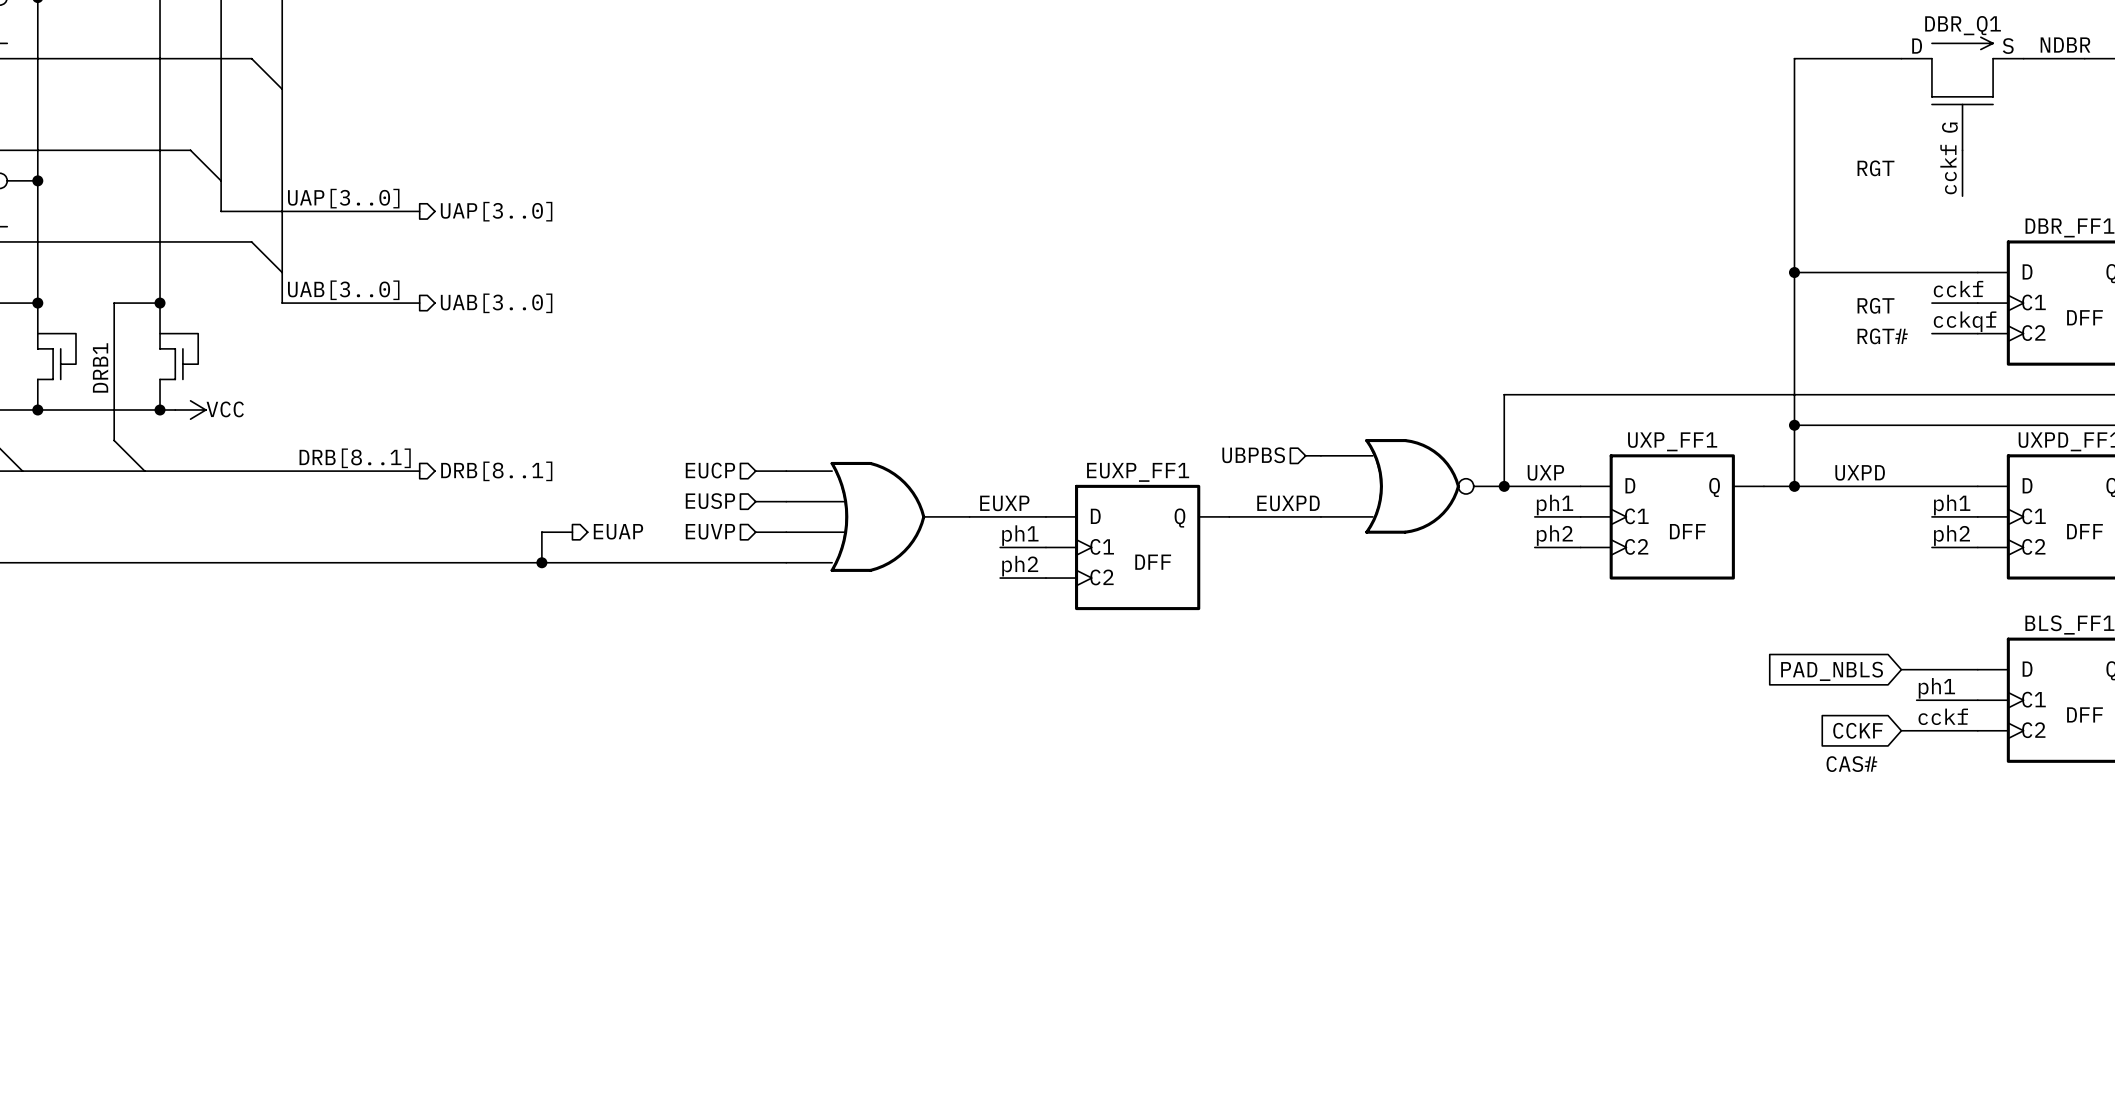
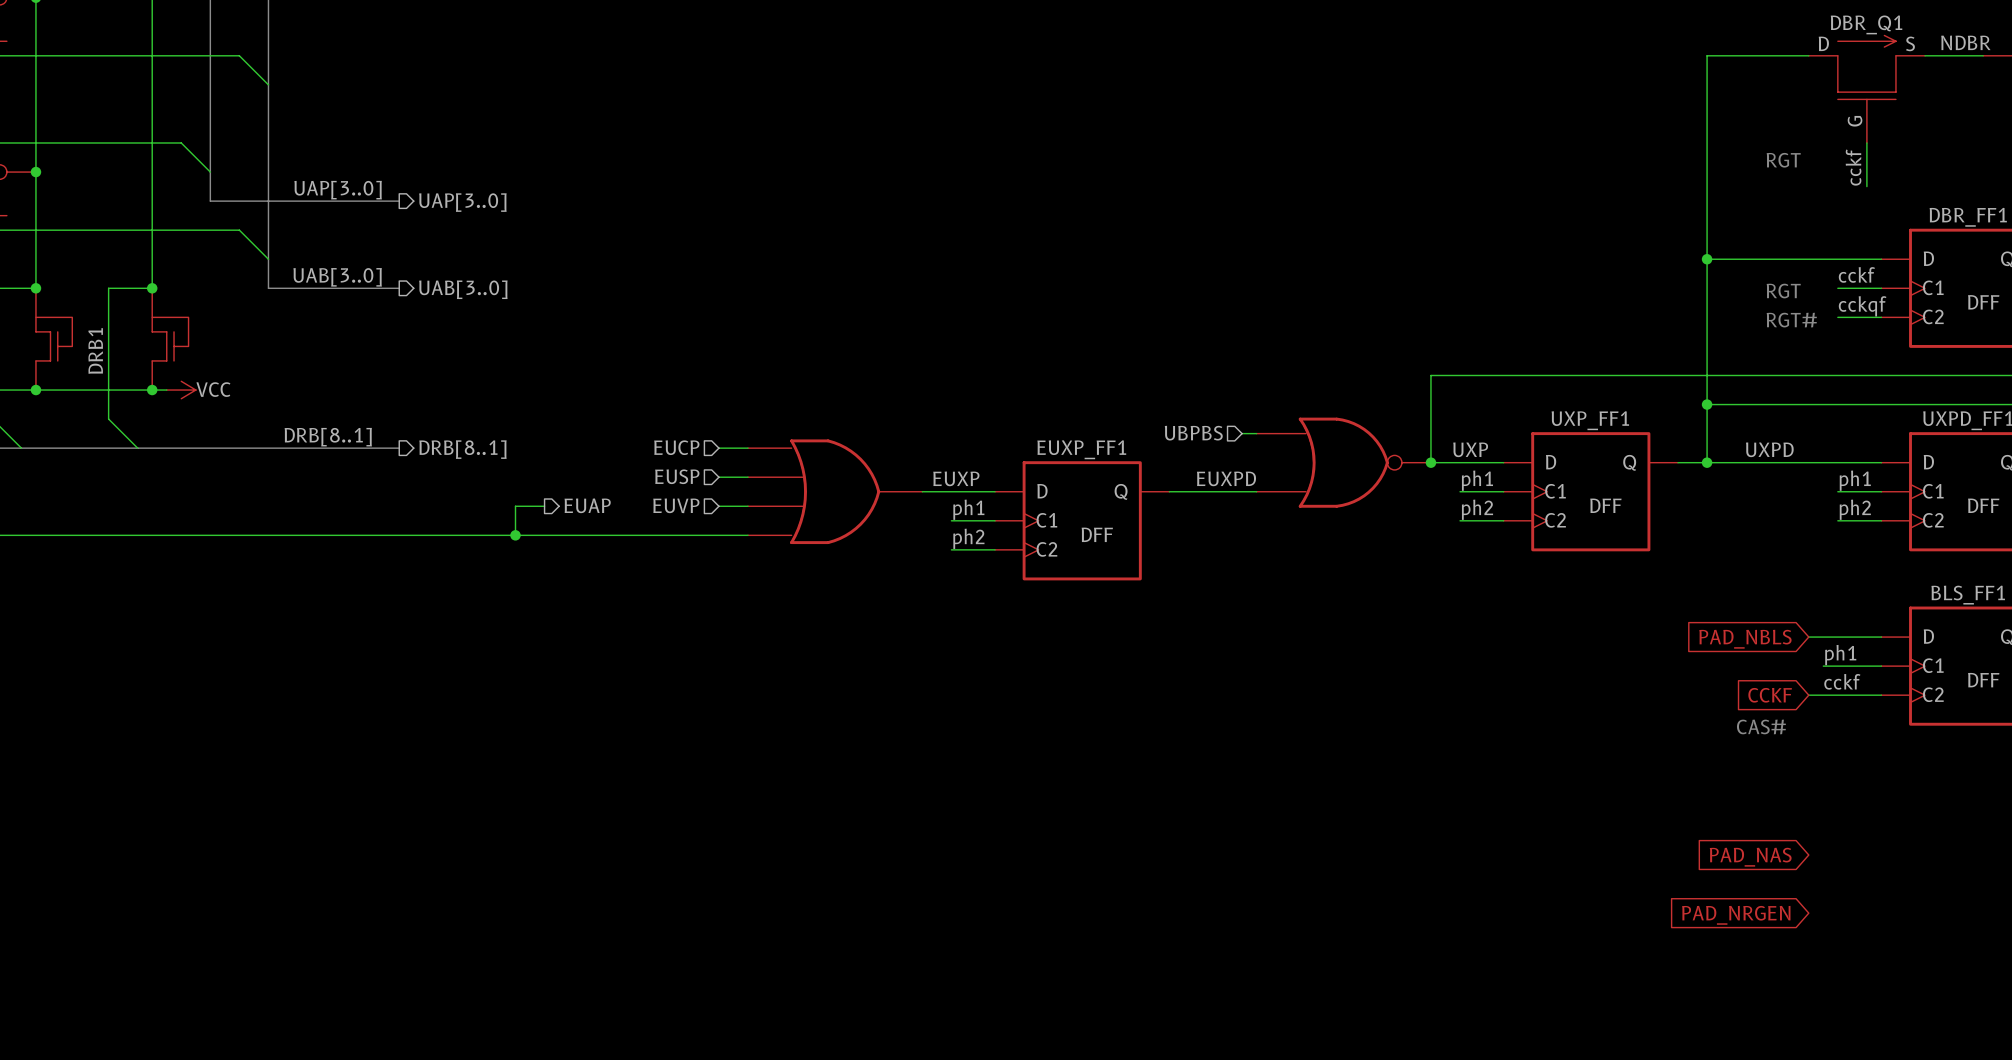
global label: none -> PAD_NAS (1750, 857)
global label: none -> PAD_NRGEN (1736, 915)

